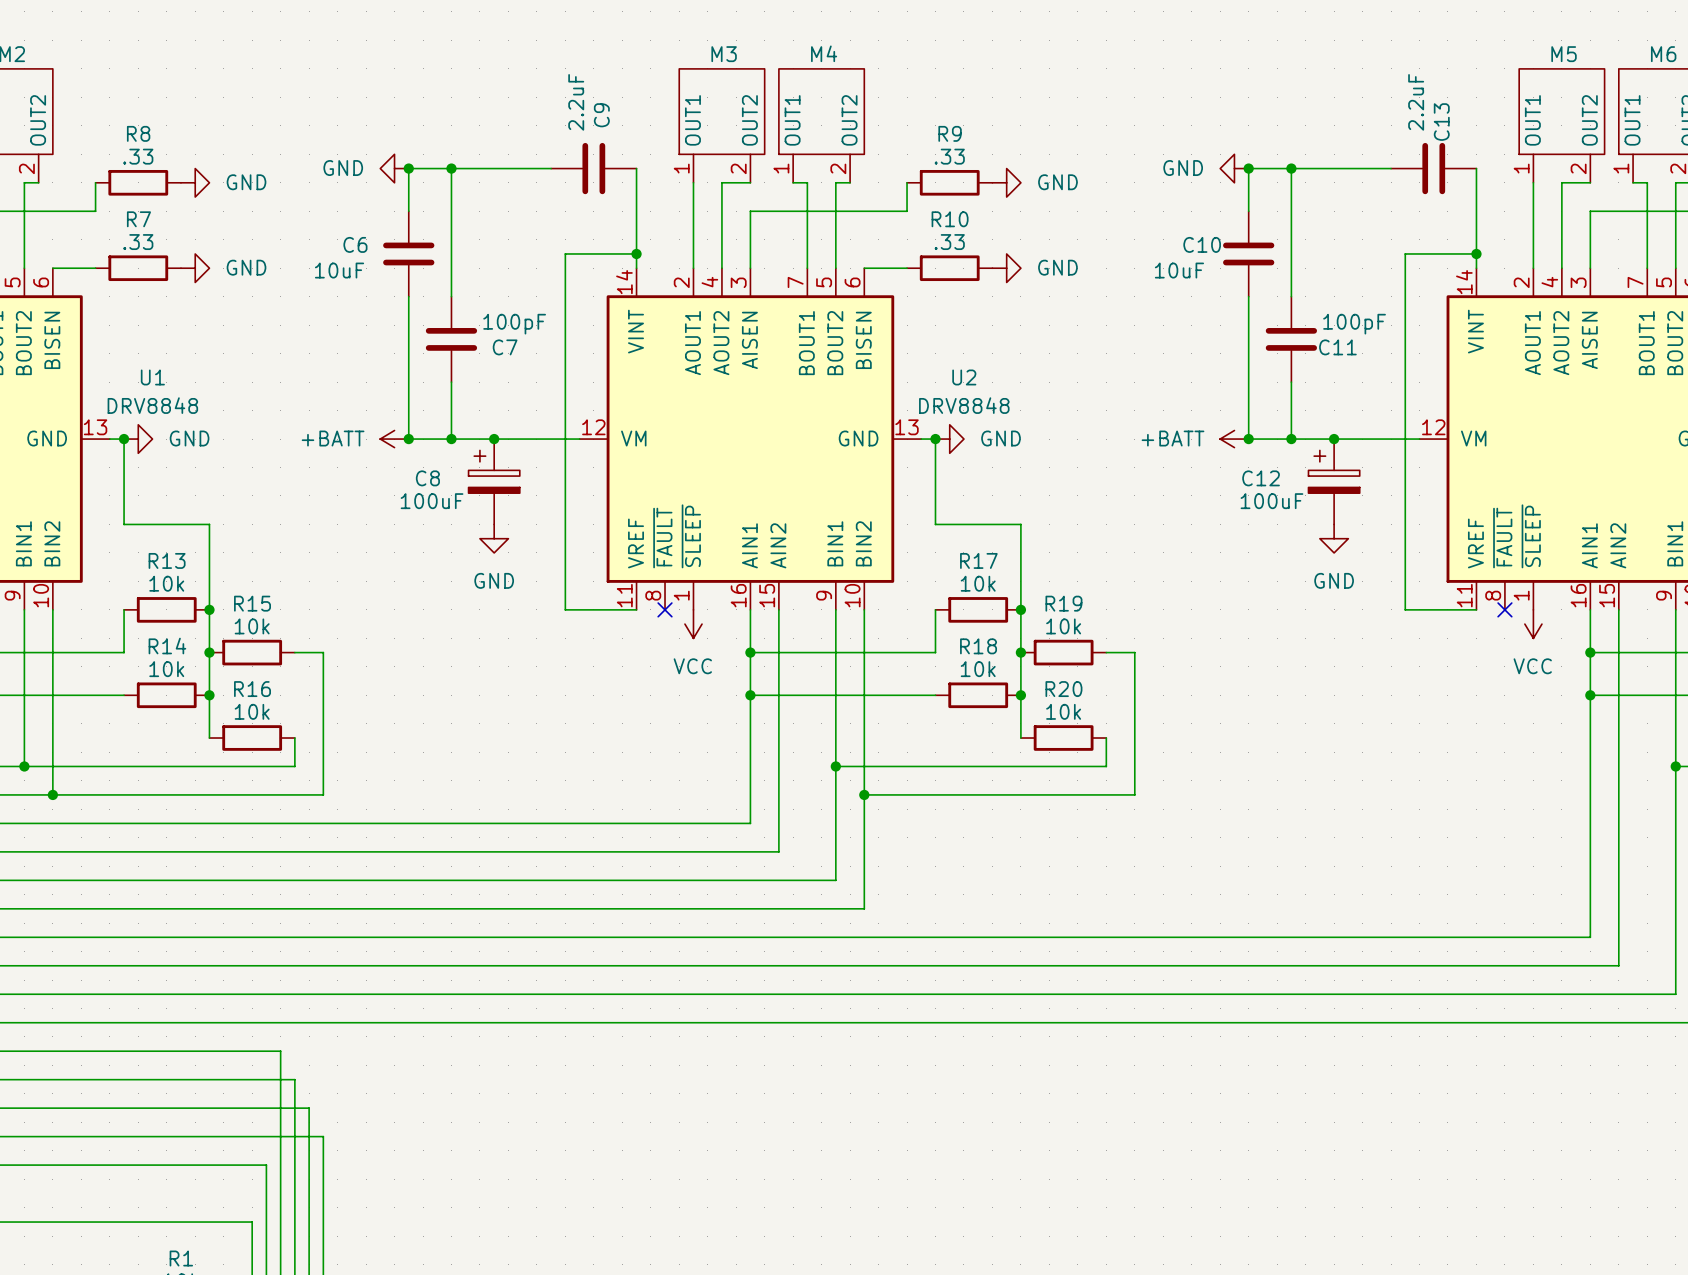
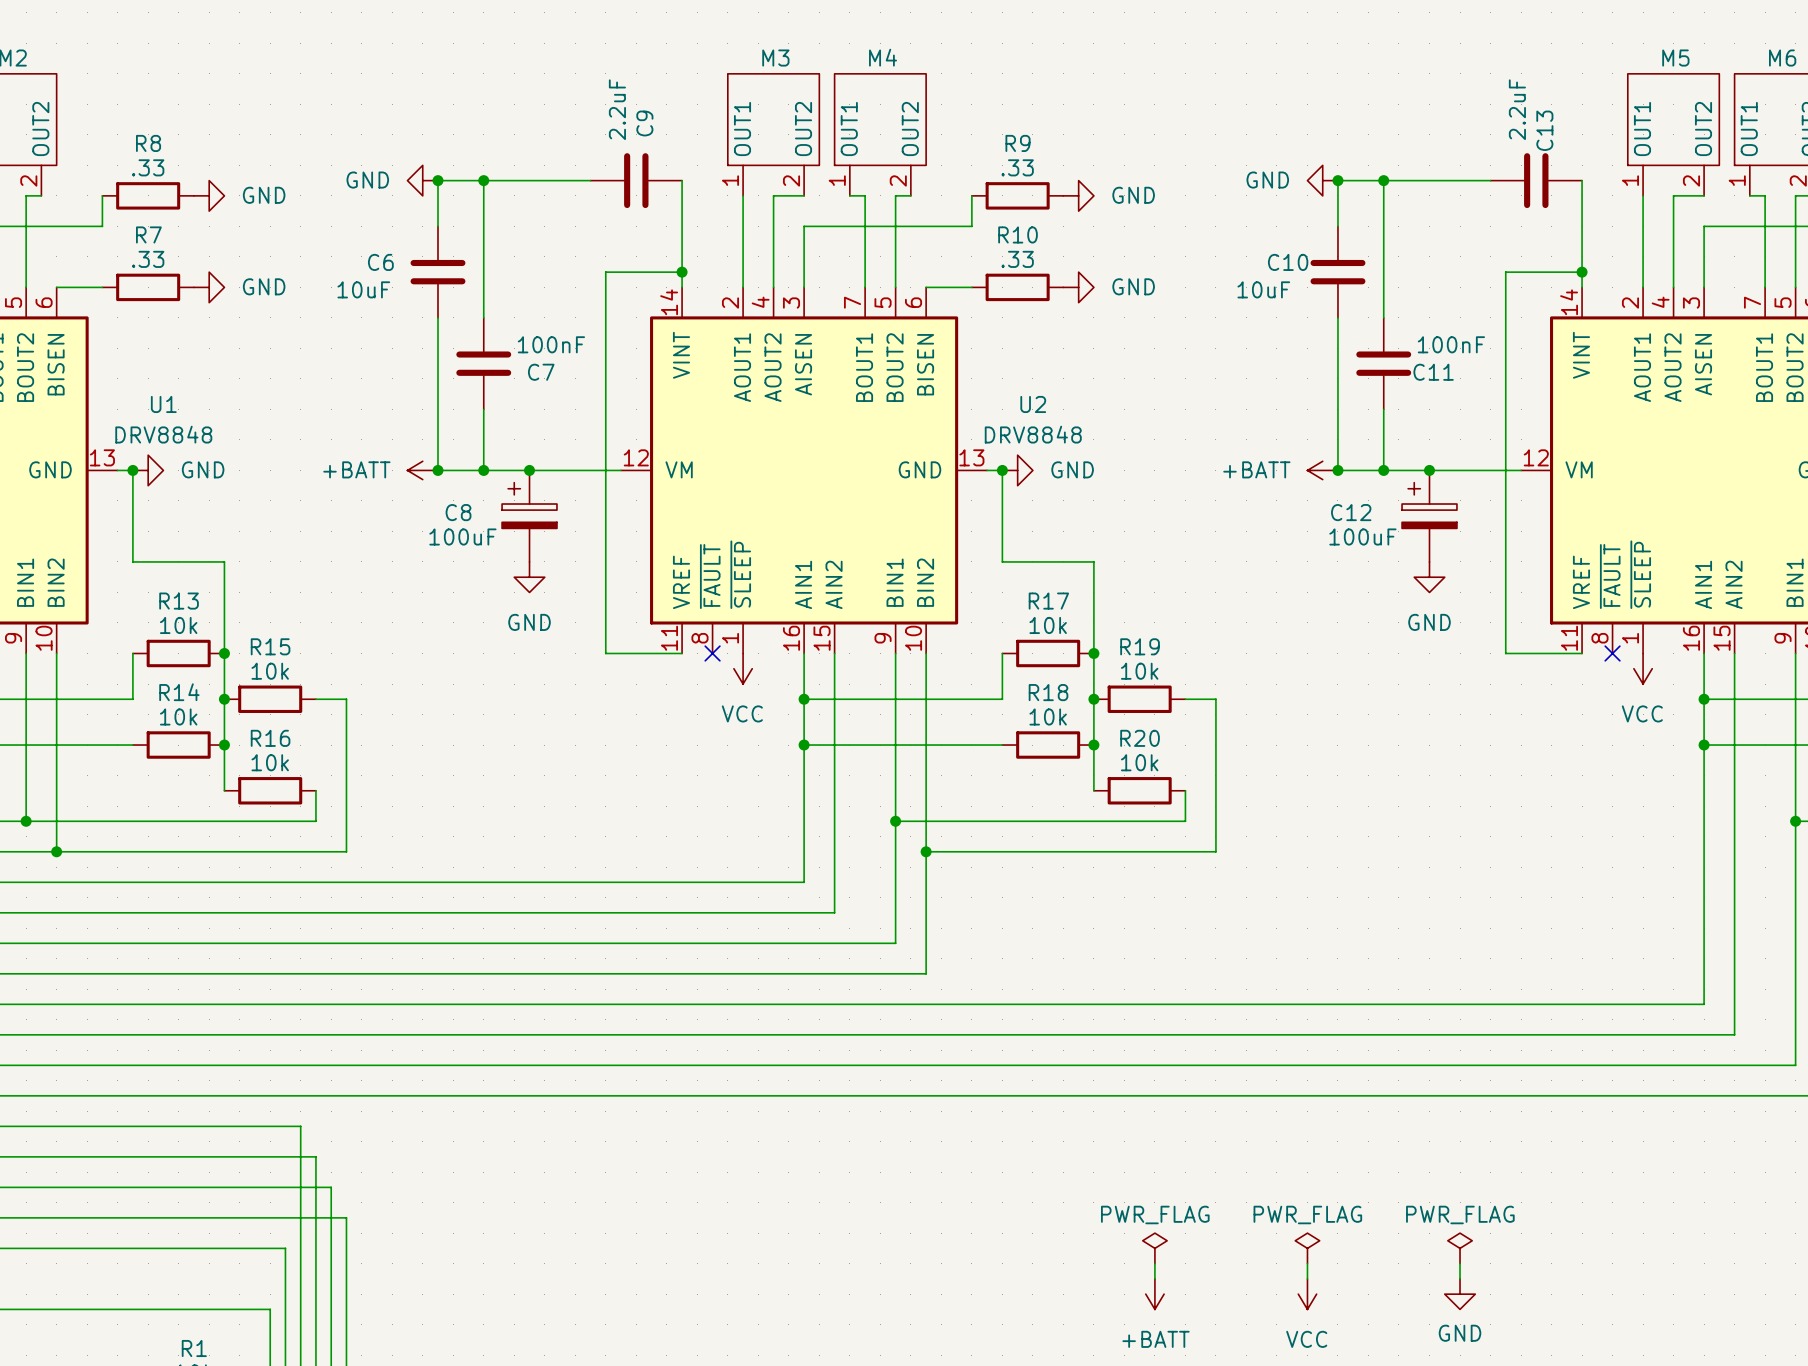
C7 value: 100pF (514, 324) -> 100nF (551, 344)
C11 value: 100pF (1354, 324) -> 100nF (1451, 344)
power symbol: none -> PWR_FLAG (1154, 1248)
power symbol: none -> PWR_FLAG (1307, 1248)
power symbol: none -> PWR_FLAG (1460, 1248)
wire: none -> (1154, 1263) (1154, 1278)
wire: none -> (1307, 1263) (1307, 1278)
wire: none -> (1460, 1263) (1460, 1278)
power symbol: none -> +BATT (1154, 1294)
power symbol: none -> VCC (1307, 1294)
power symbol: none -> GND (1460, 1294)

